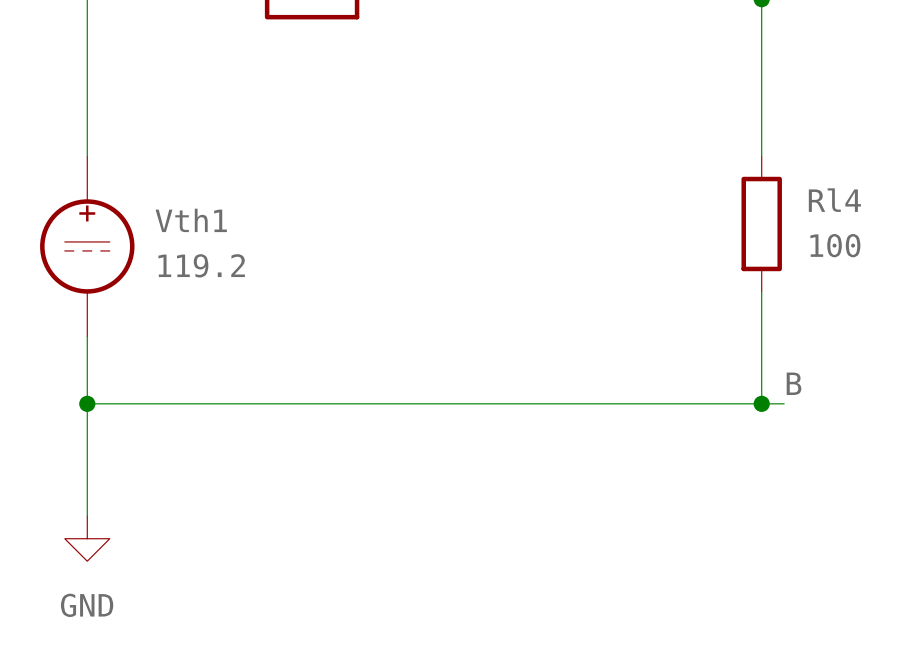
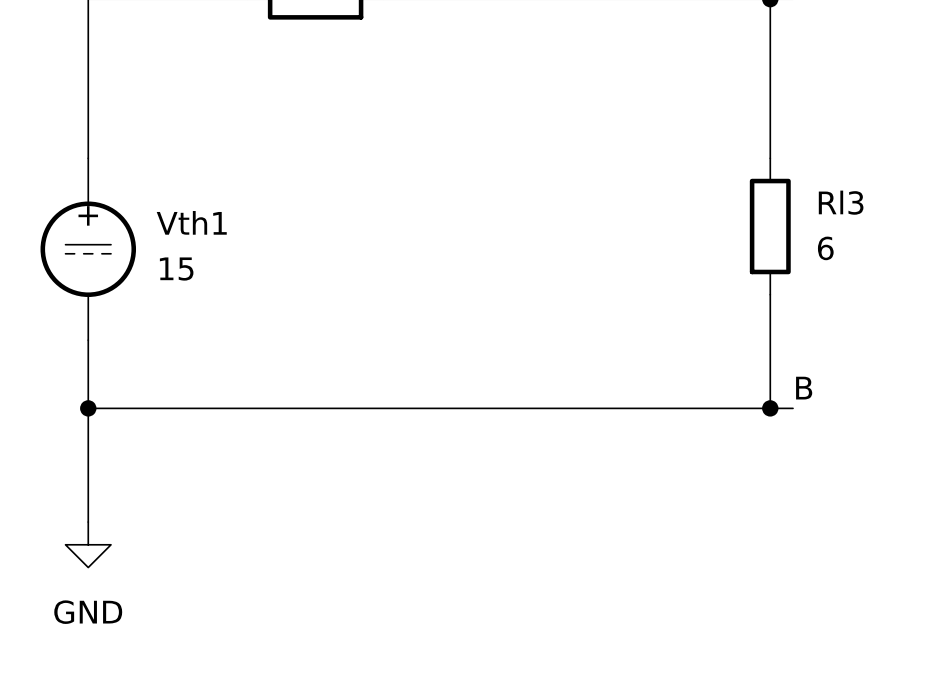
Rl4 name: Rl4 (834, 200) -> Rl3 (841, 202)
Rl4 value: 100 (835, 245) -> 6 (825, 248)
Vth1 value: 119.2 (201, 265) -> 15 (176, 269)

